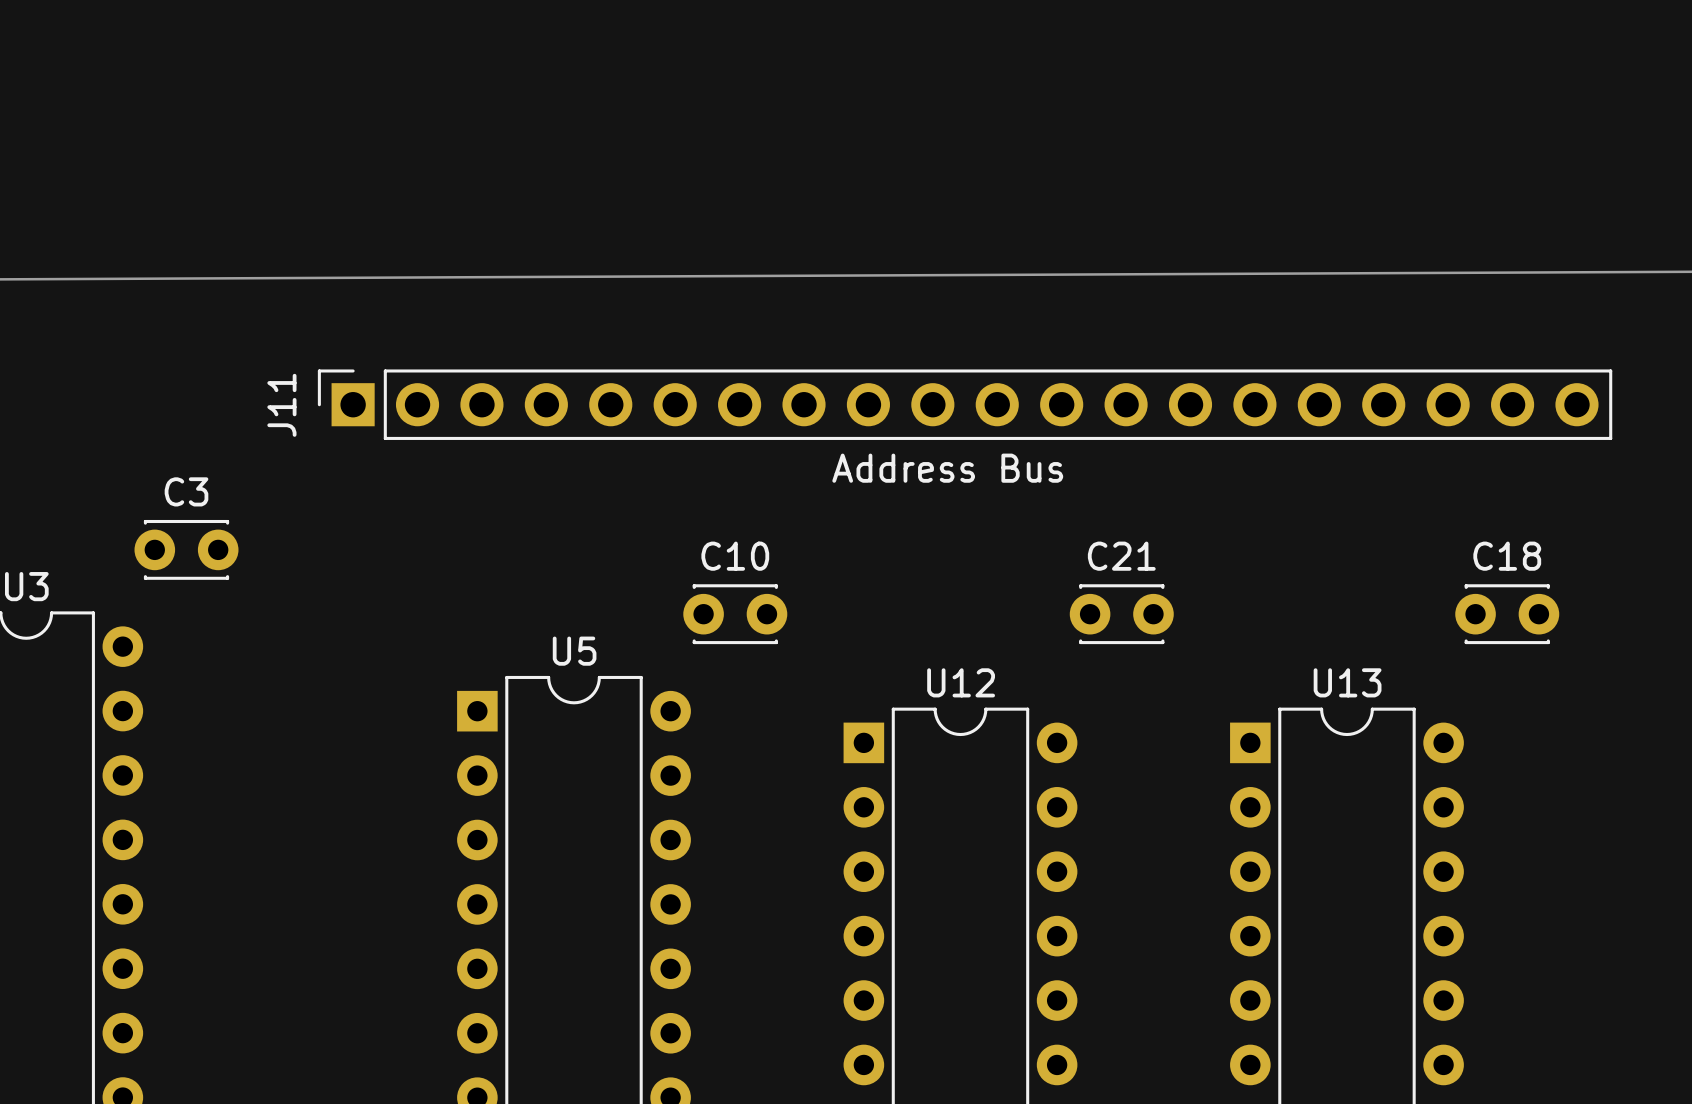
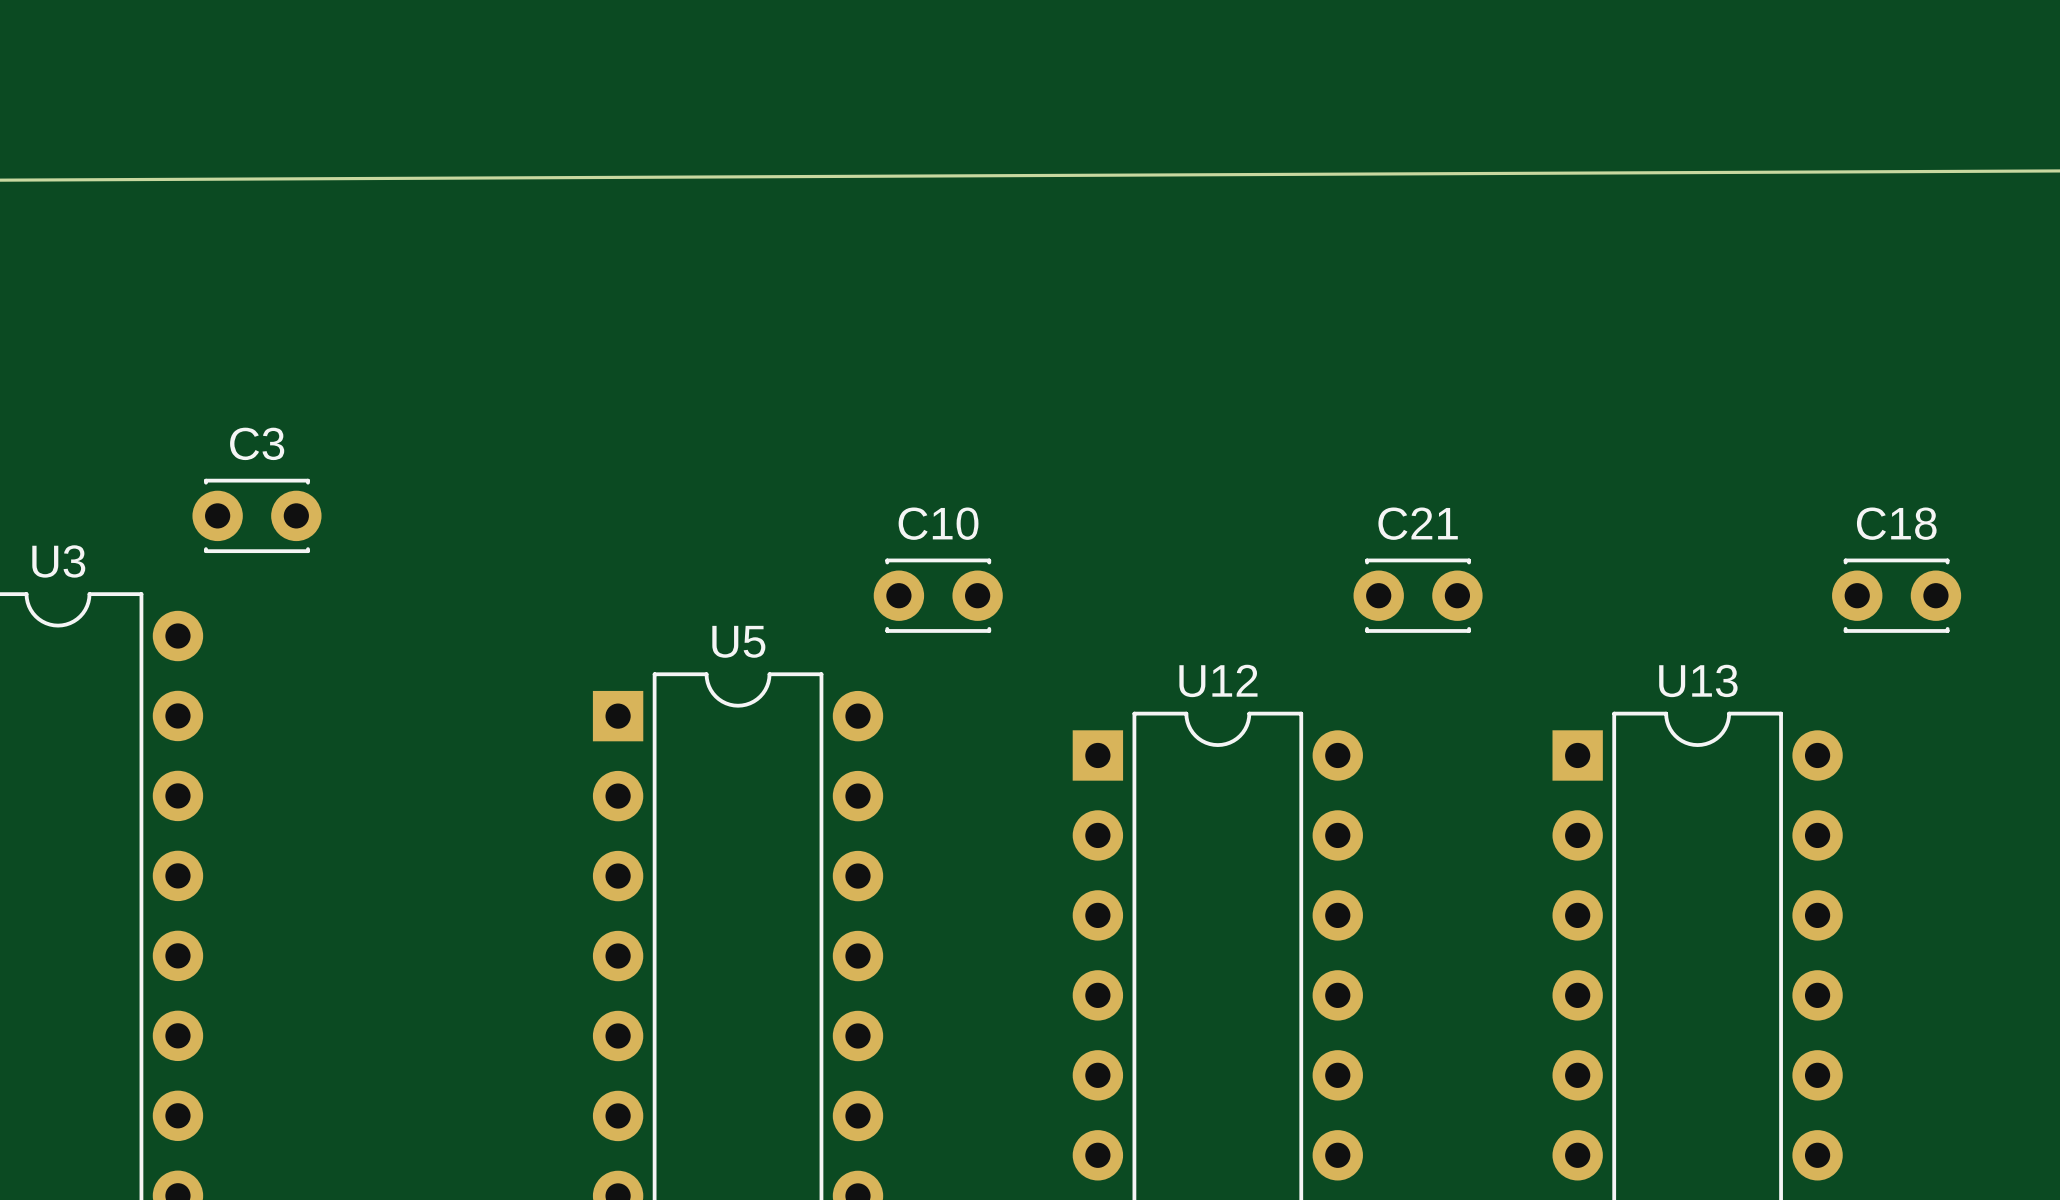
J11: Address Bus (965, 404) -> none

